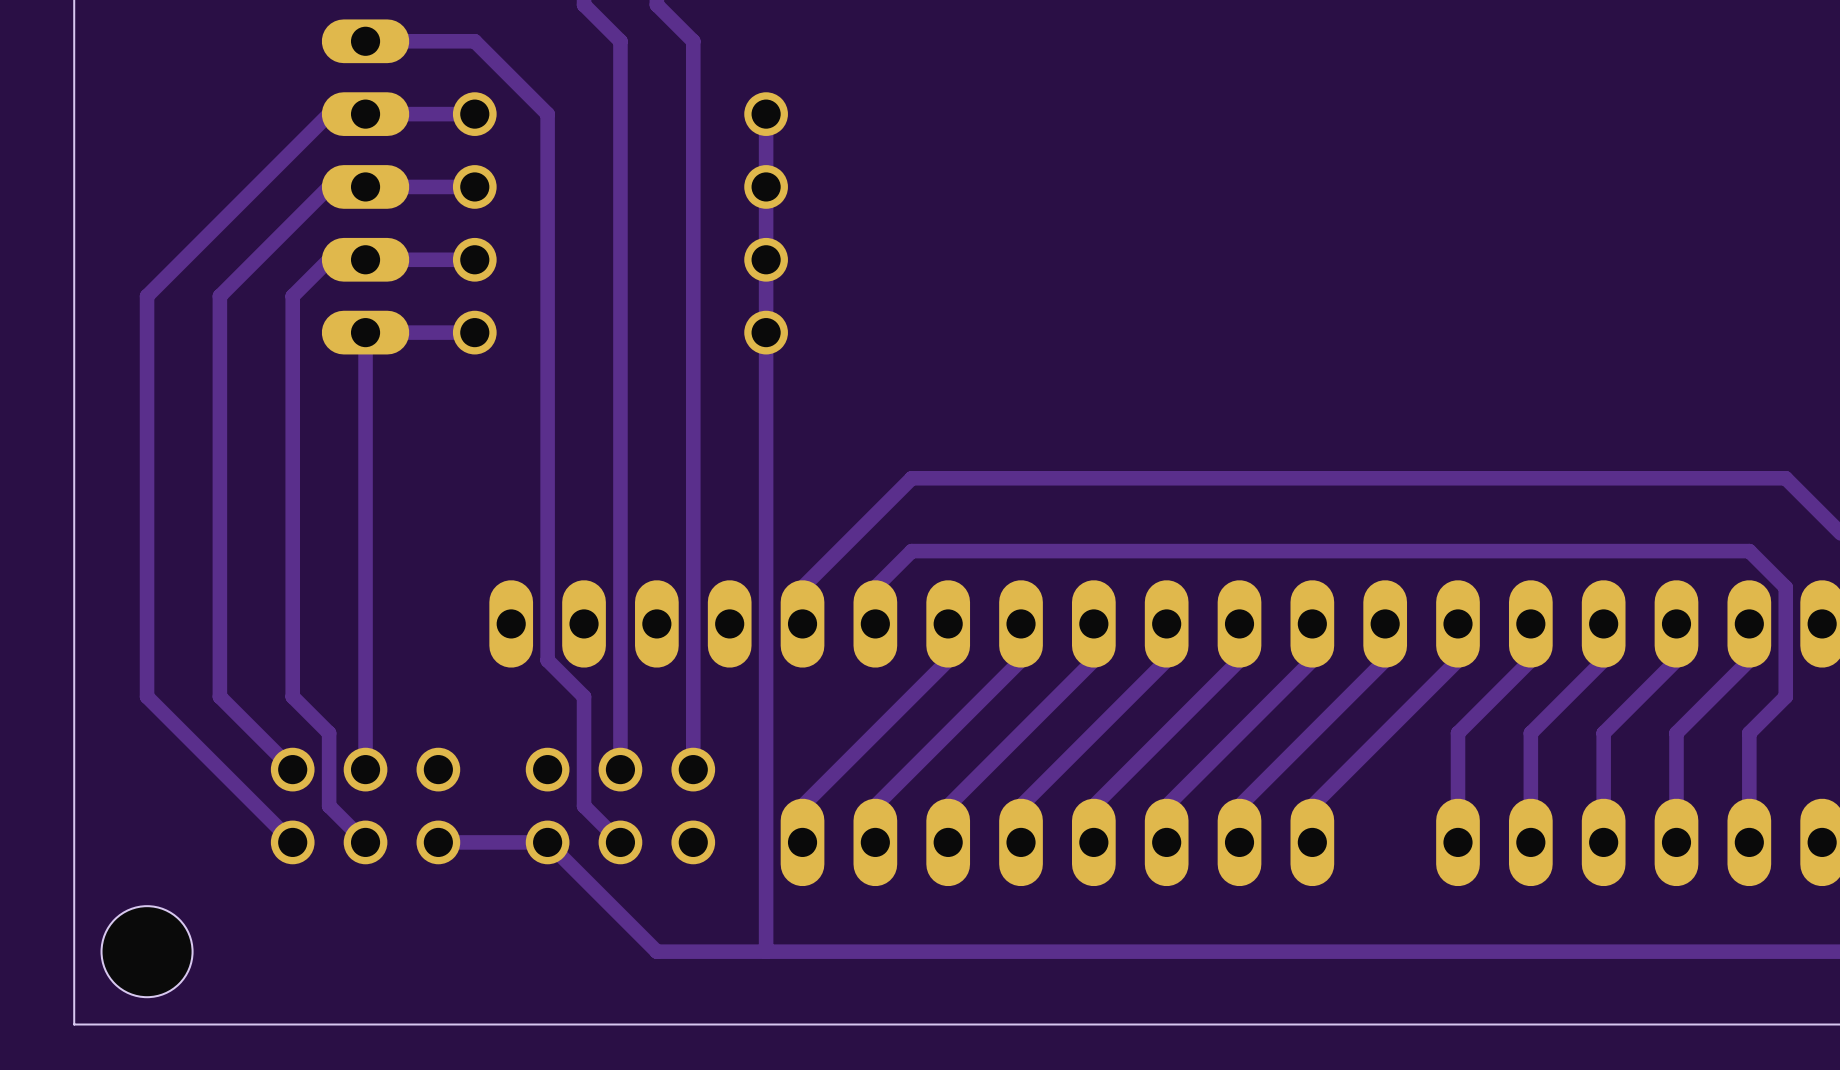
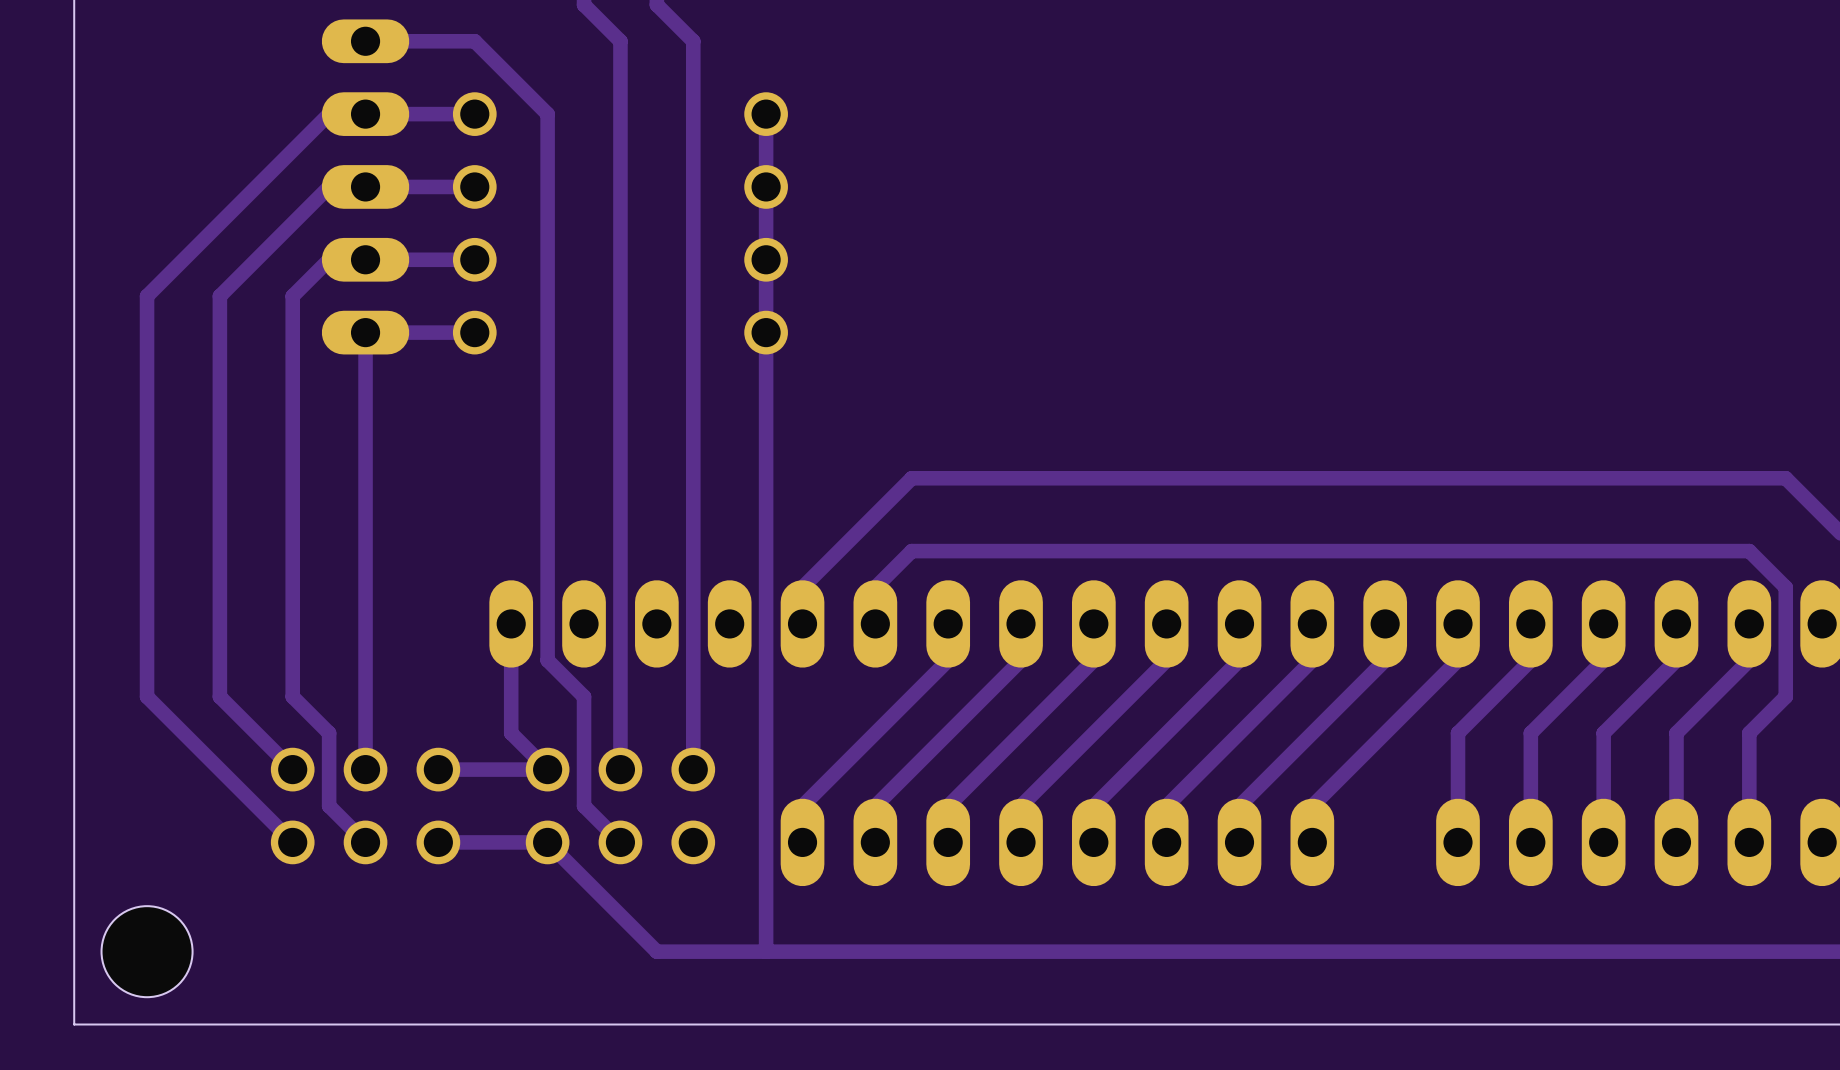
track: none -> (511, 623) (511, 733) (547, 769) (438, 769)

